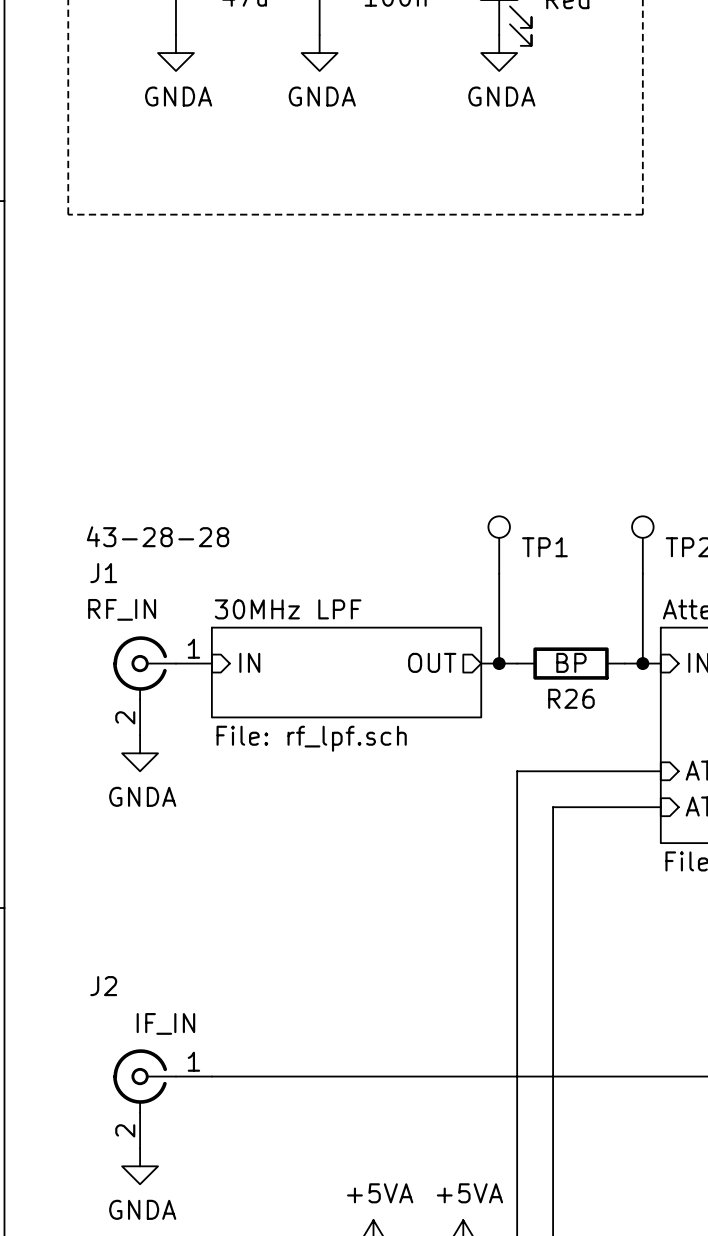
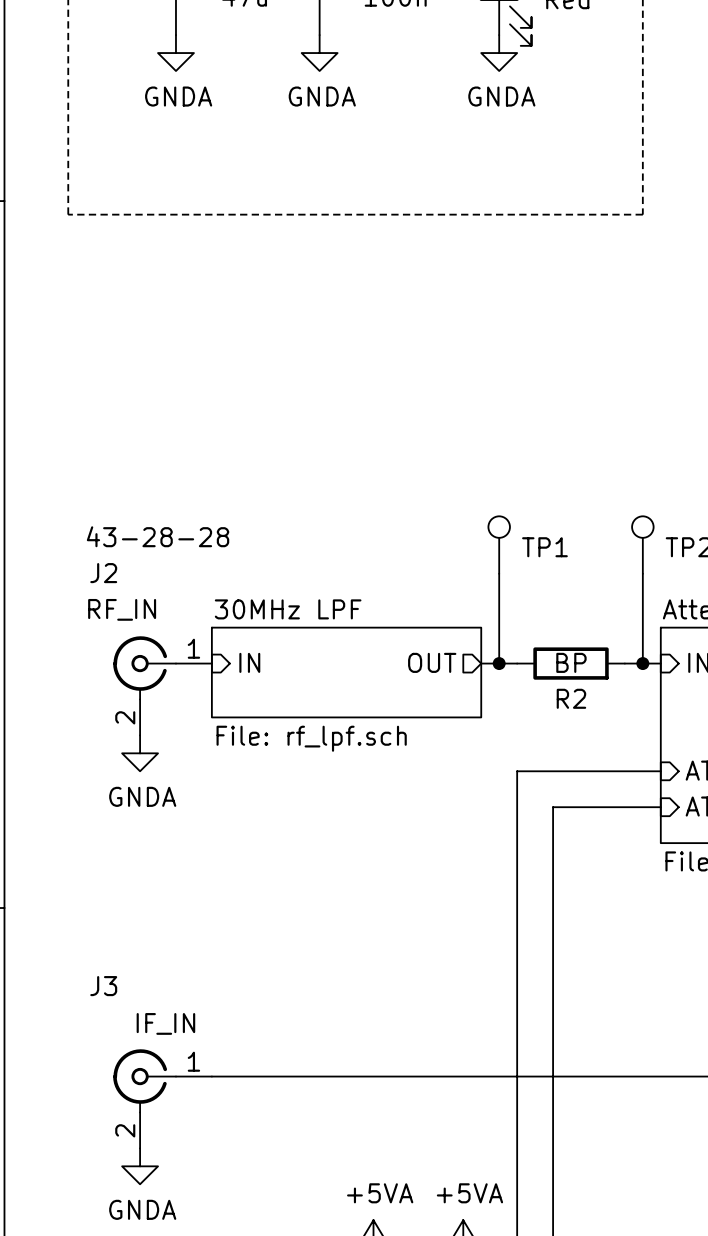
J1 name: J1 (103, 573) -> J2 (103, 573)
R26 name: R26 (571, 698) -> R2 (571, 698)
J2 name: J2 (103, 986) -> J3 (103, 986)

